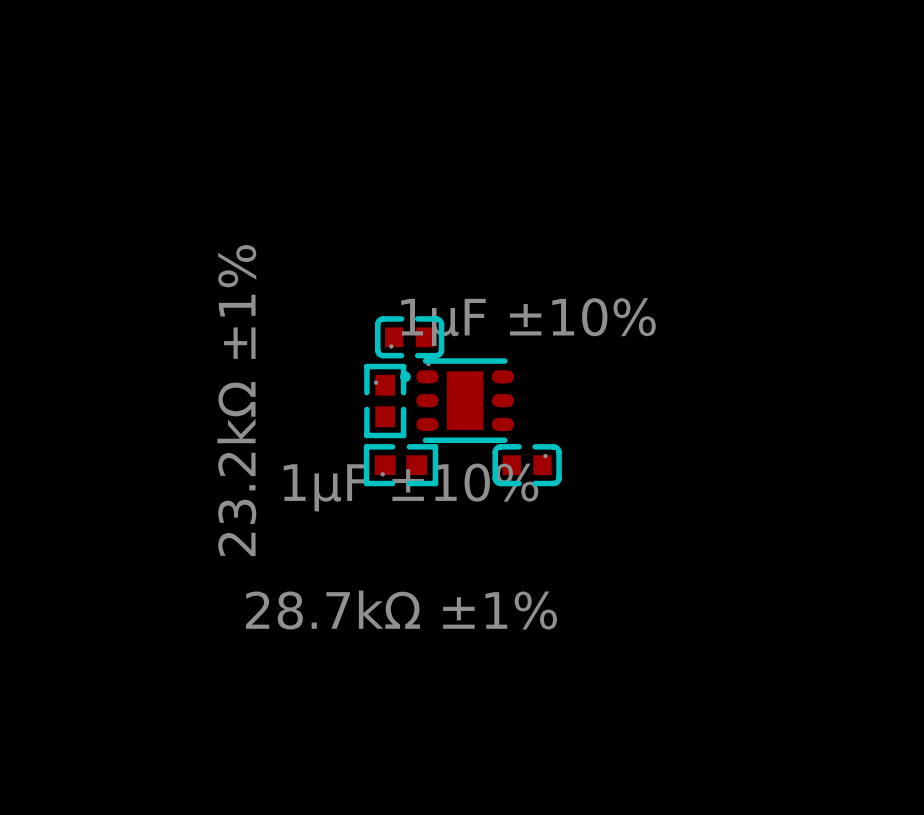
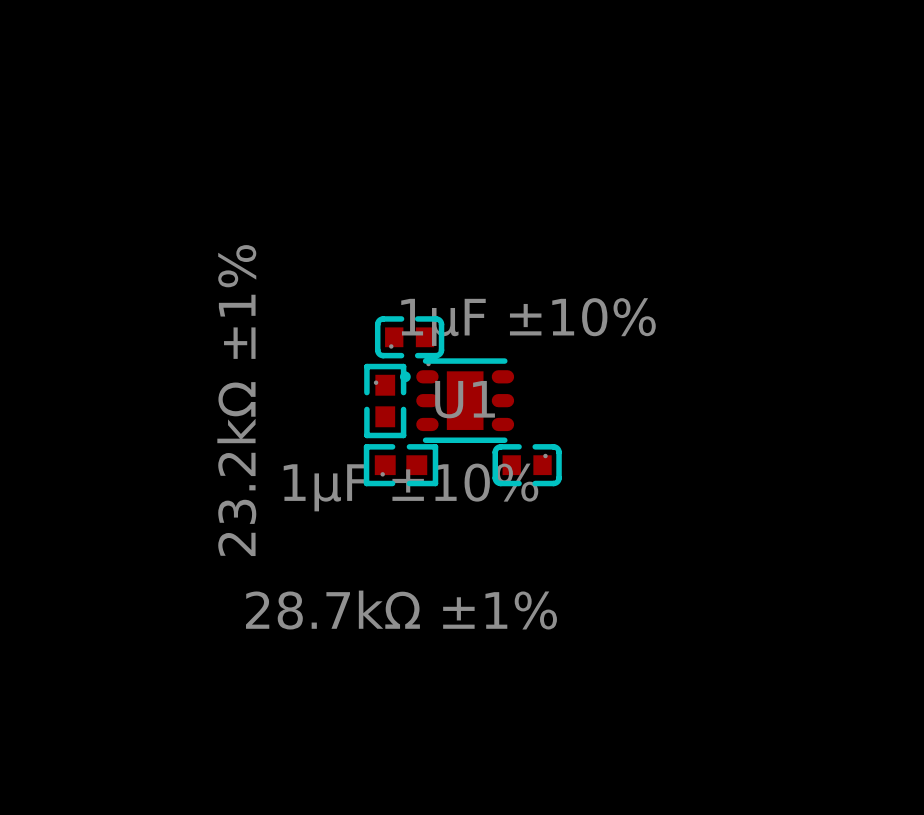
U1 name: none -> U1 (465, 399)

